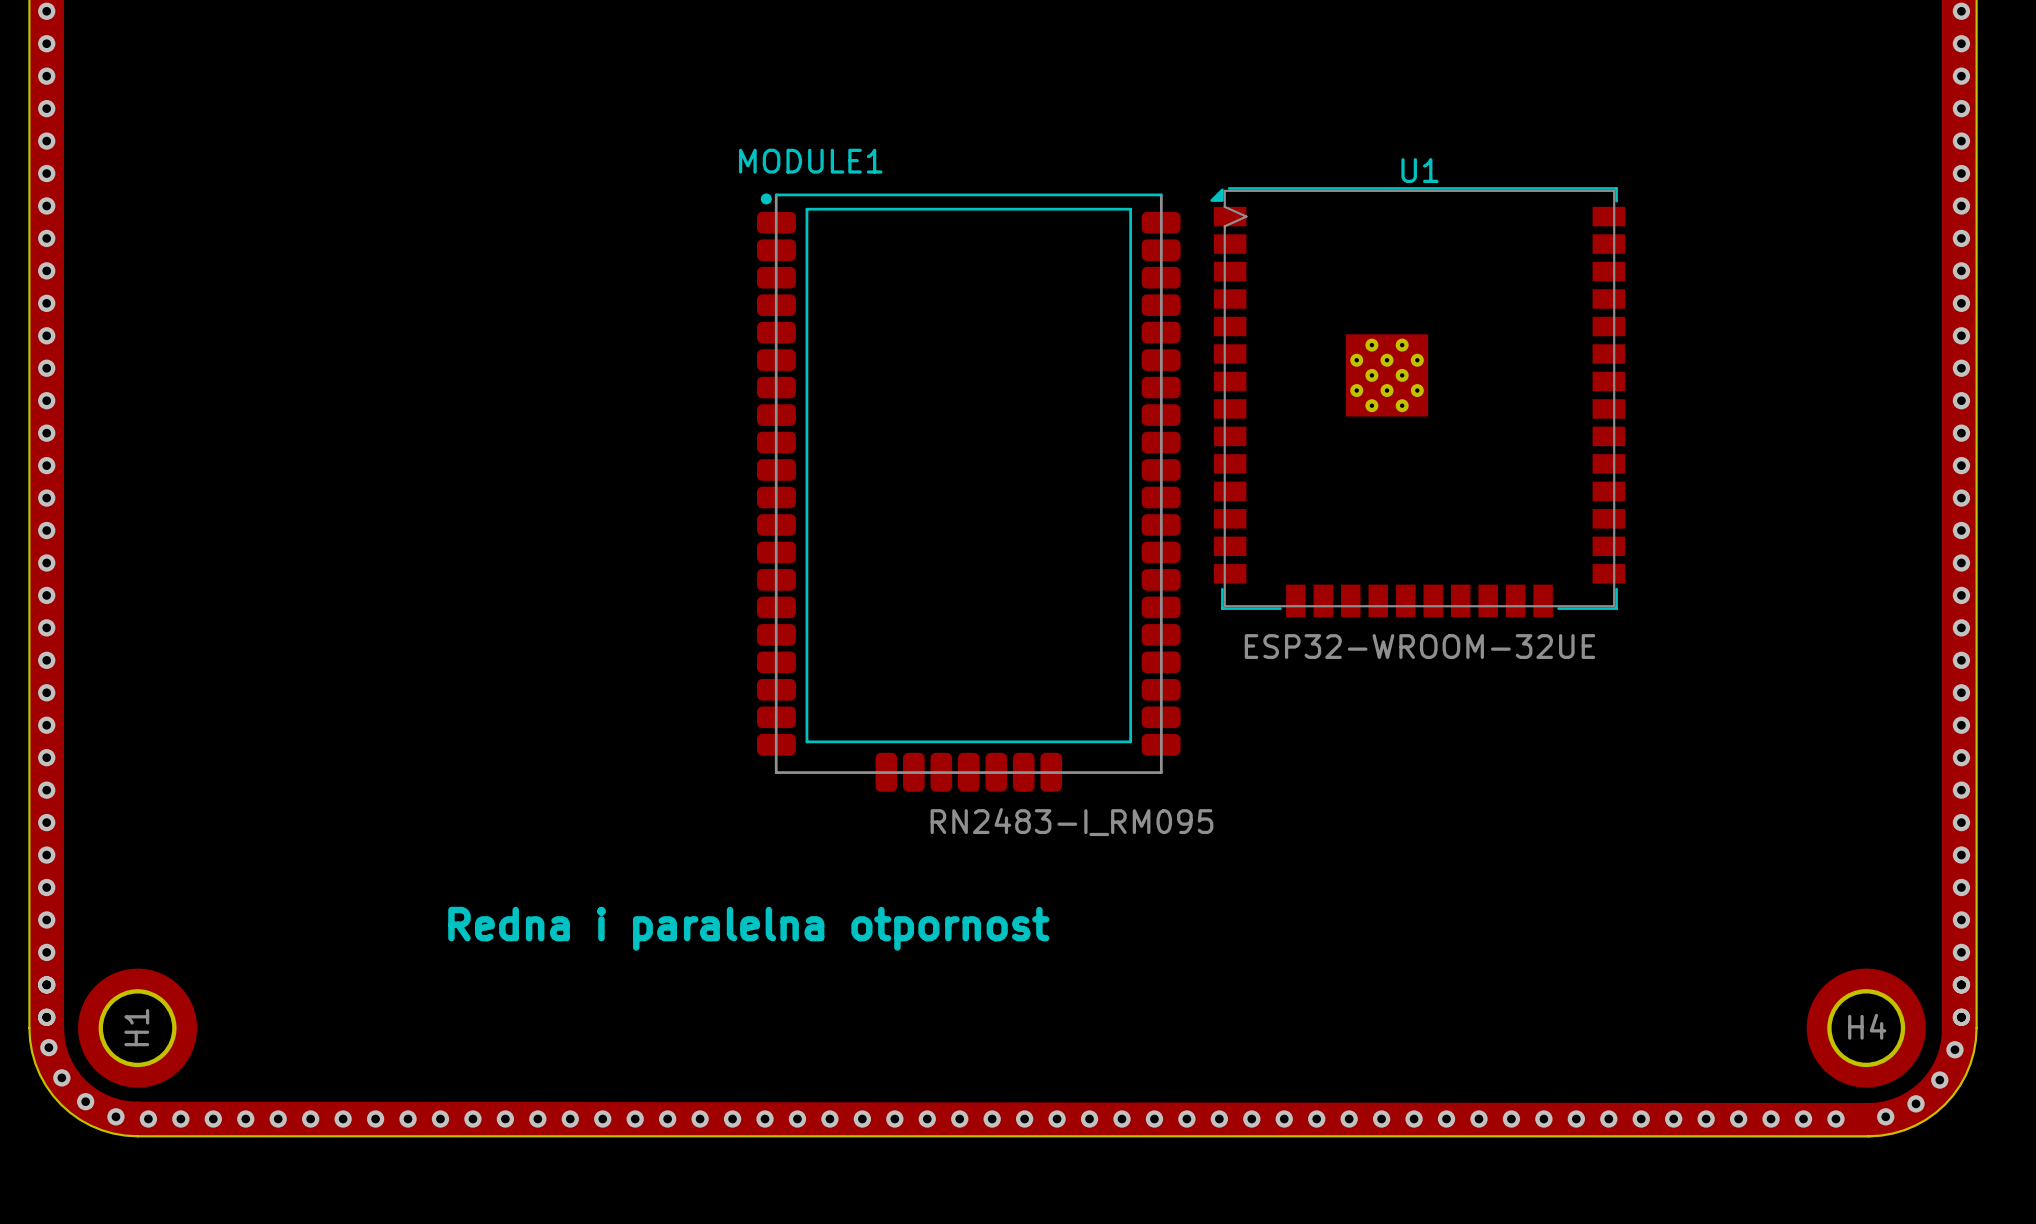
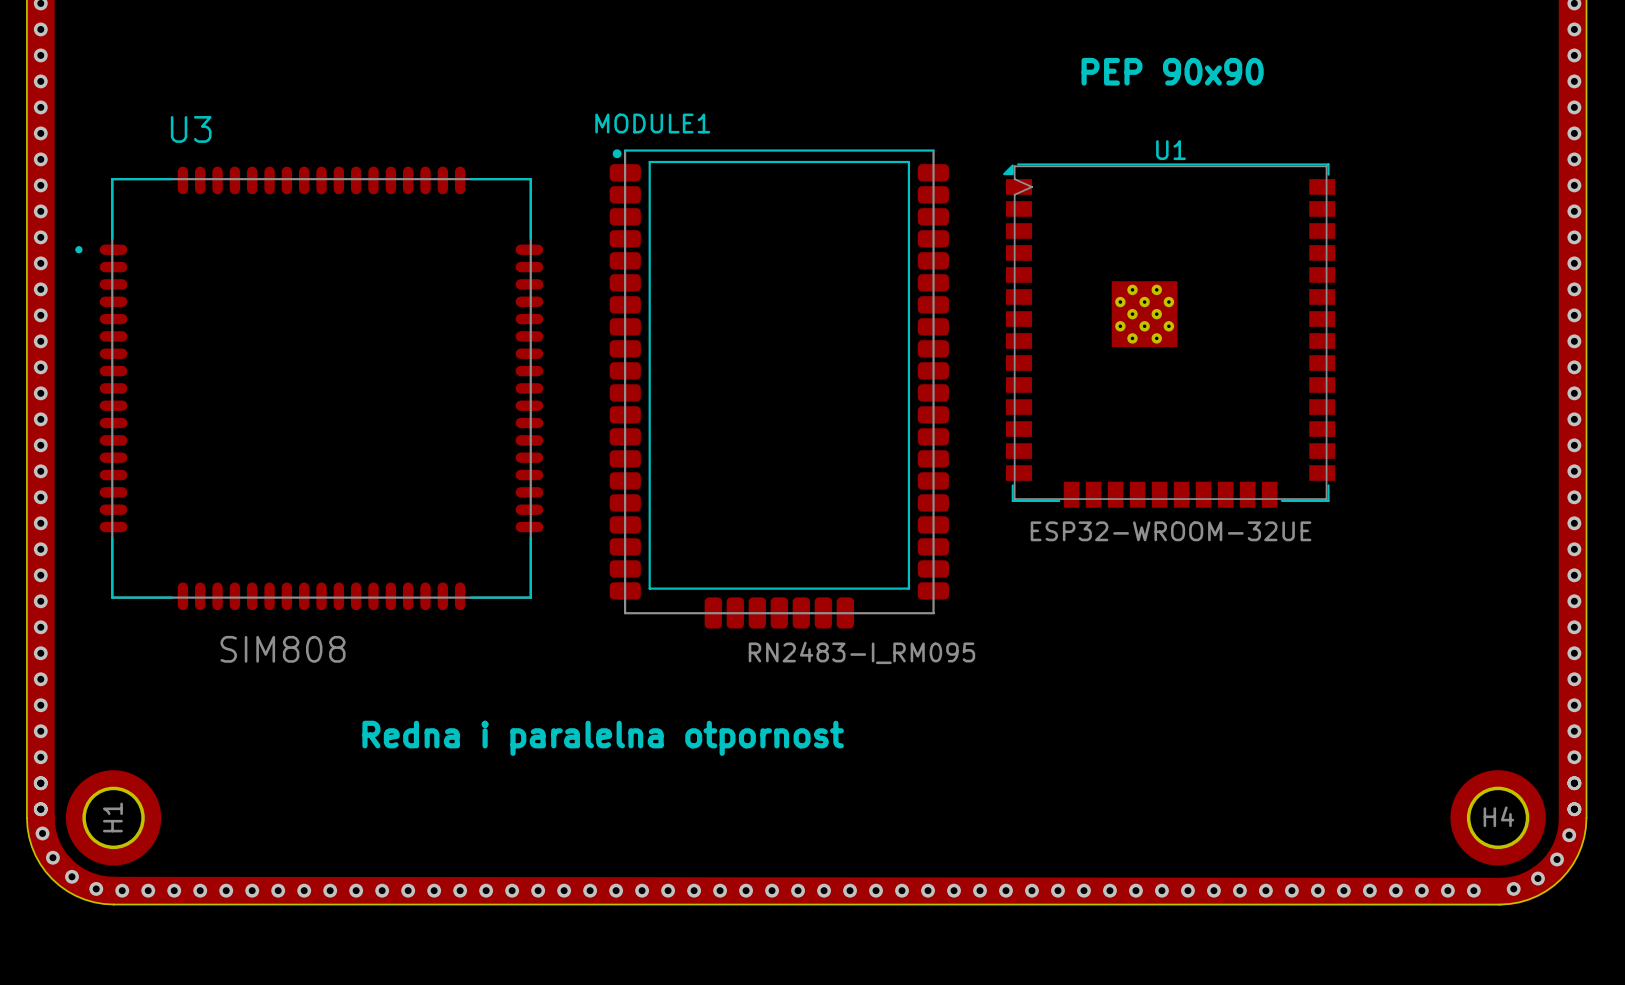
text: none -> PEP 90x90 (1172, 71)
U1 position: (1417, 402) -> (1169, 335)
U3: none -> SIM808 (309, 388)

